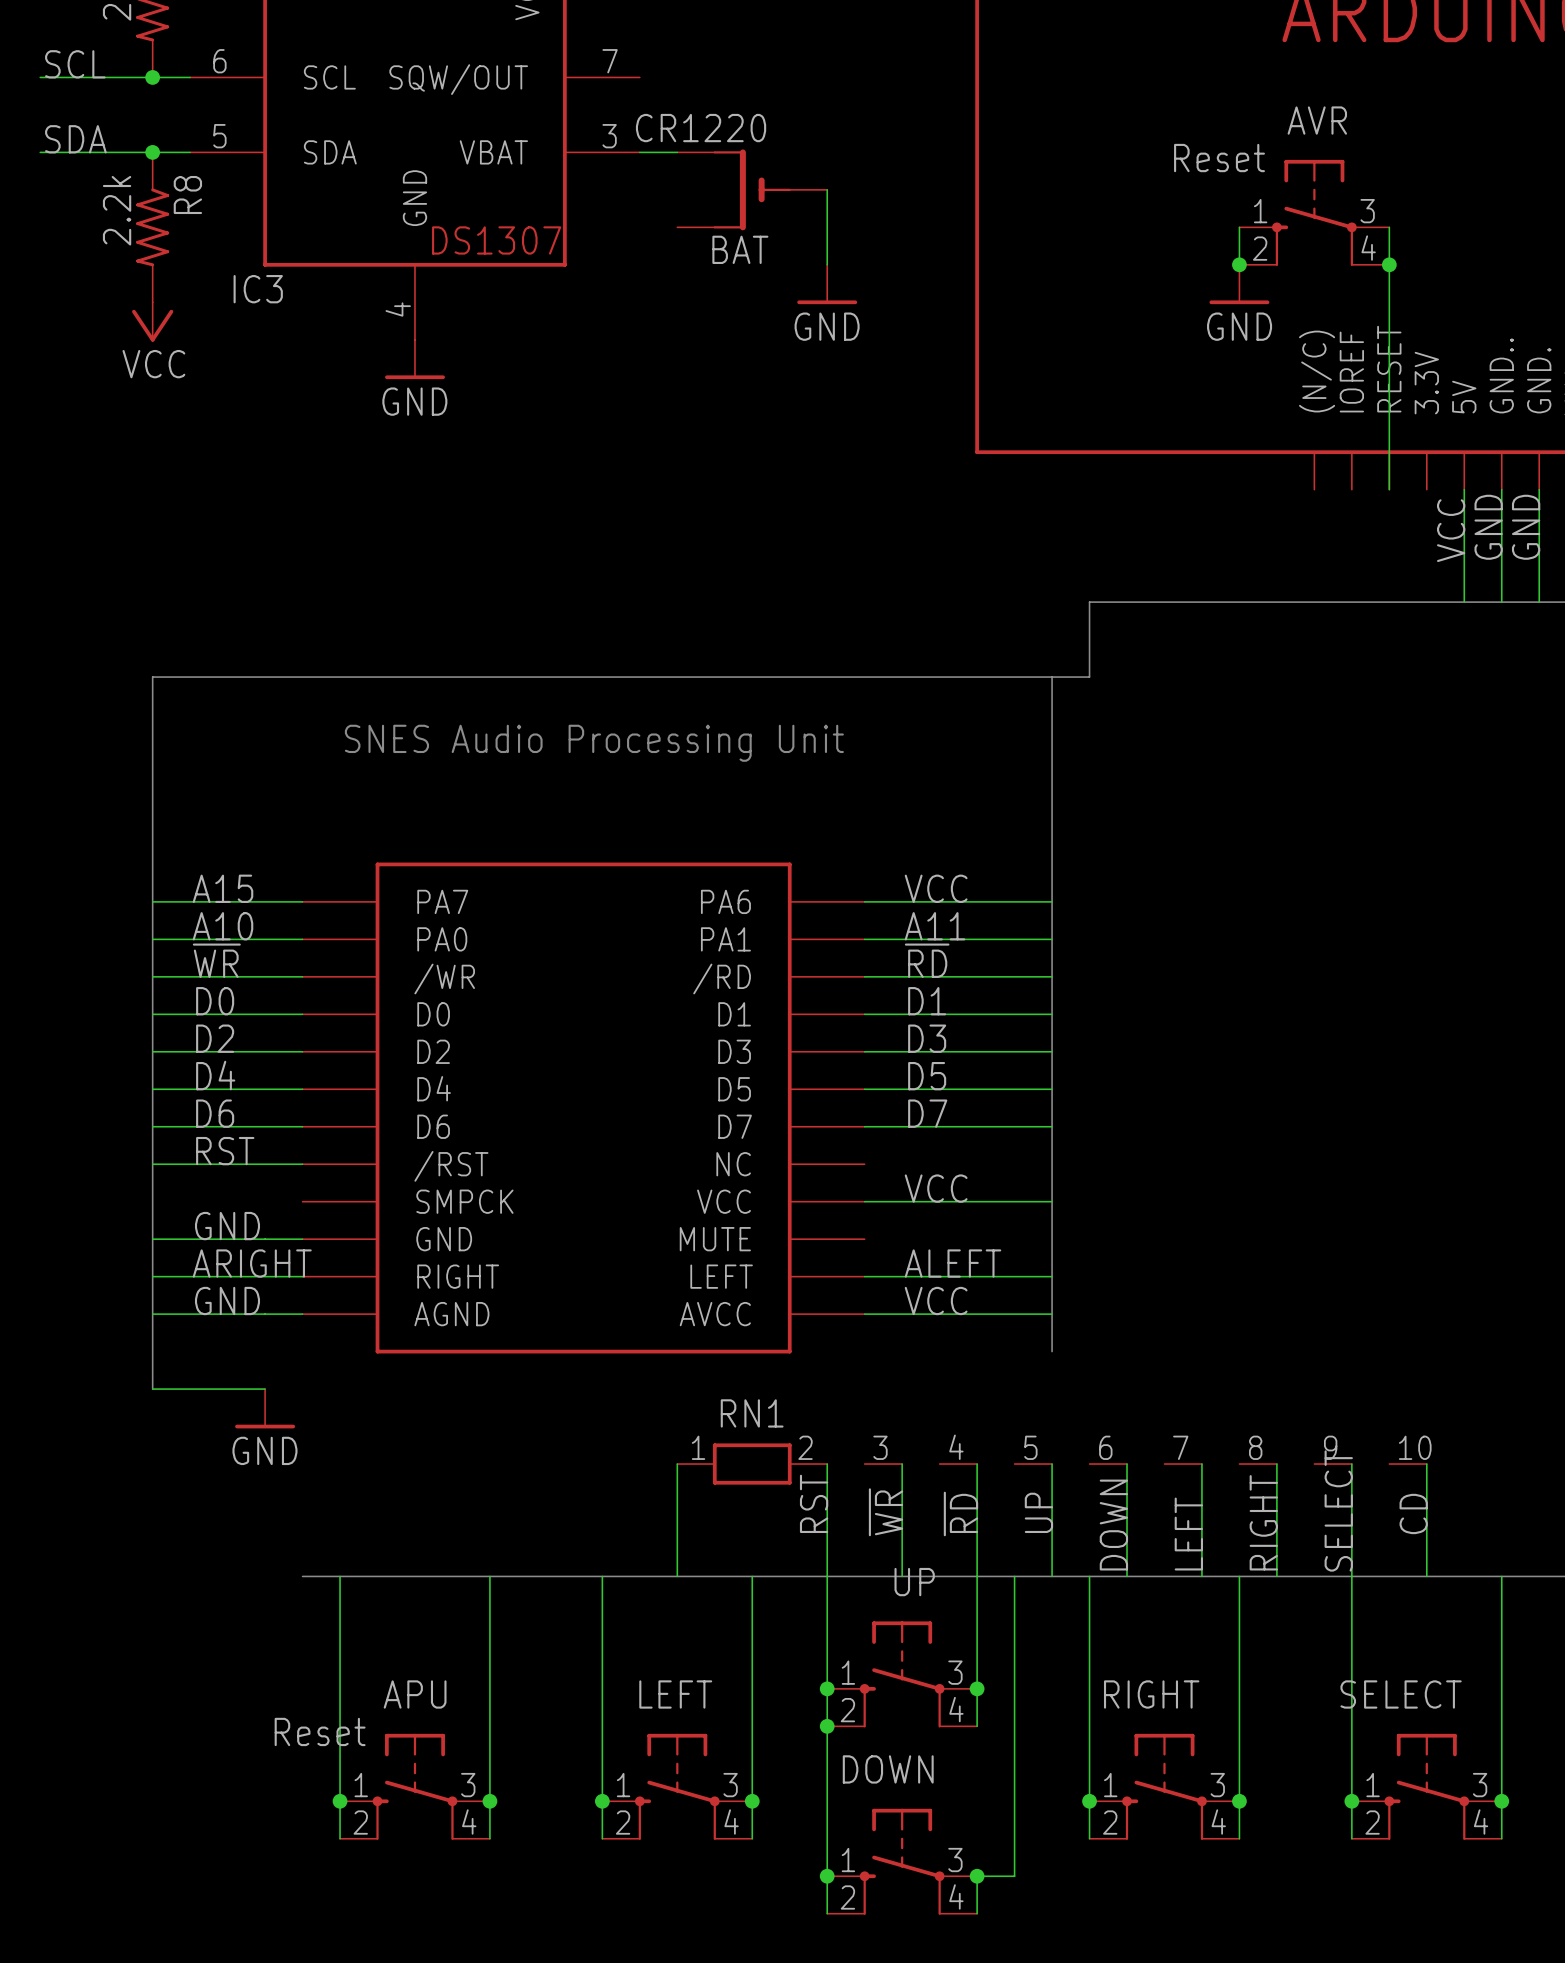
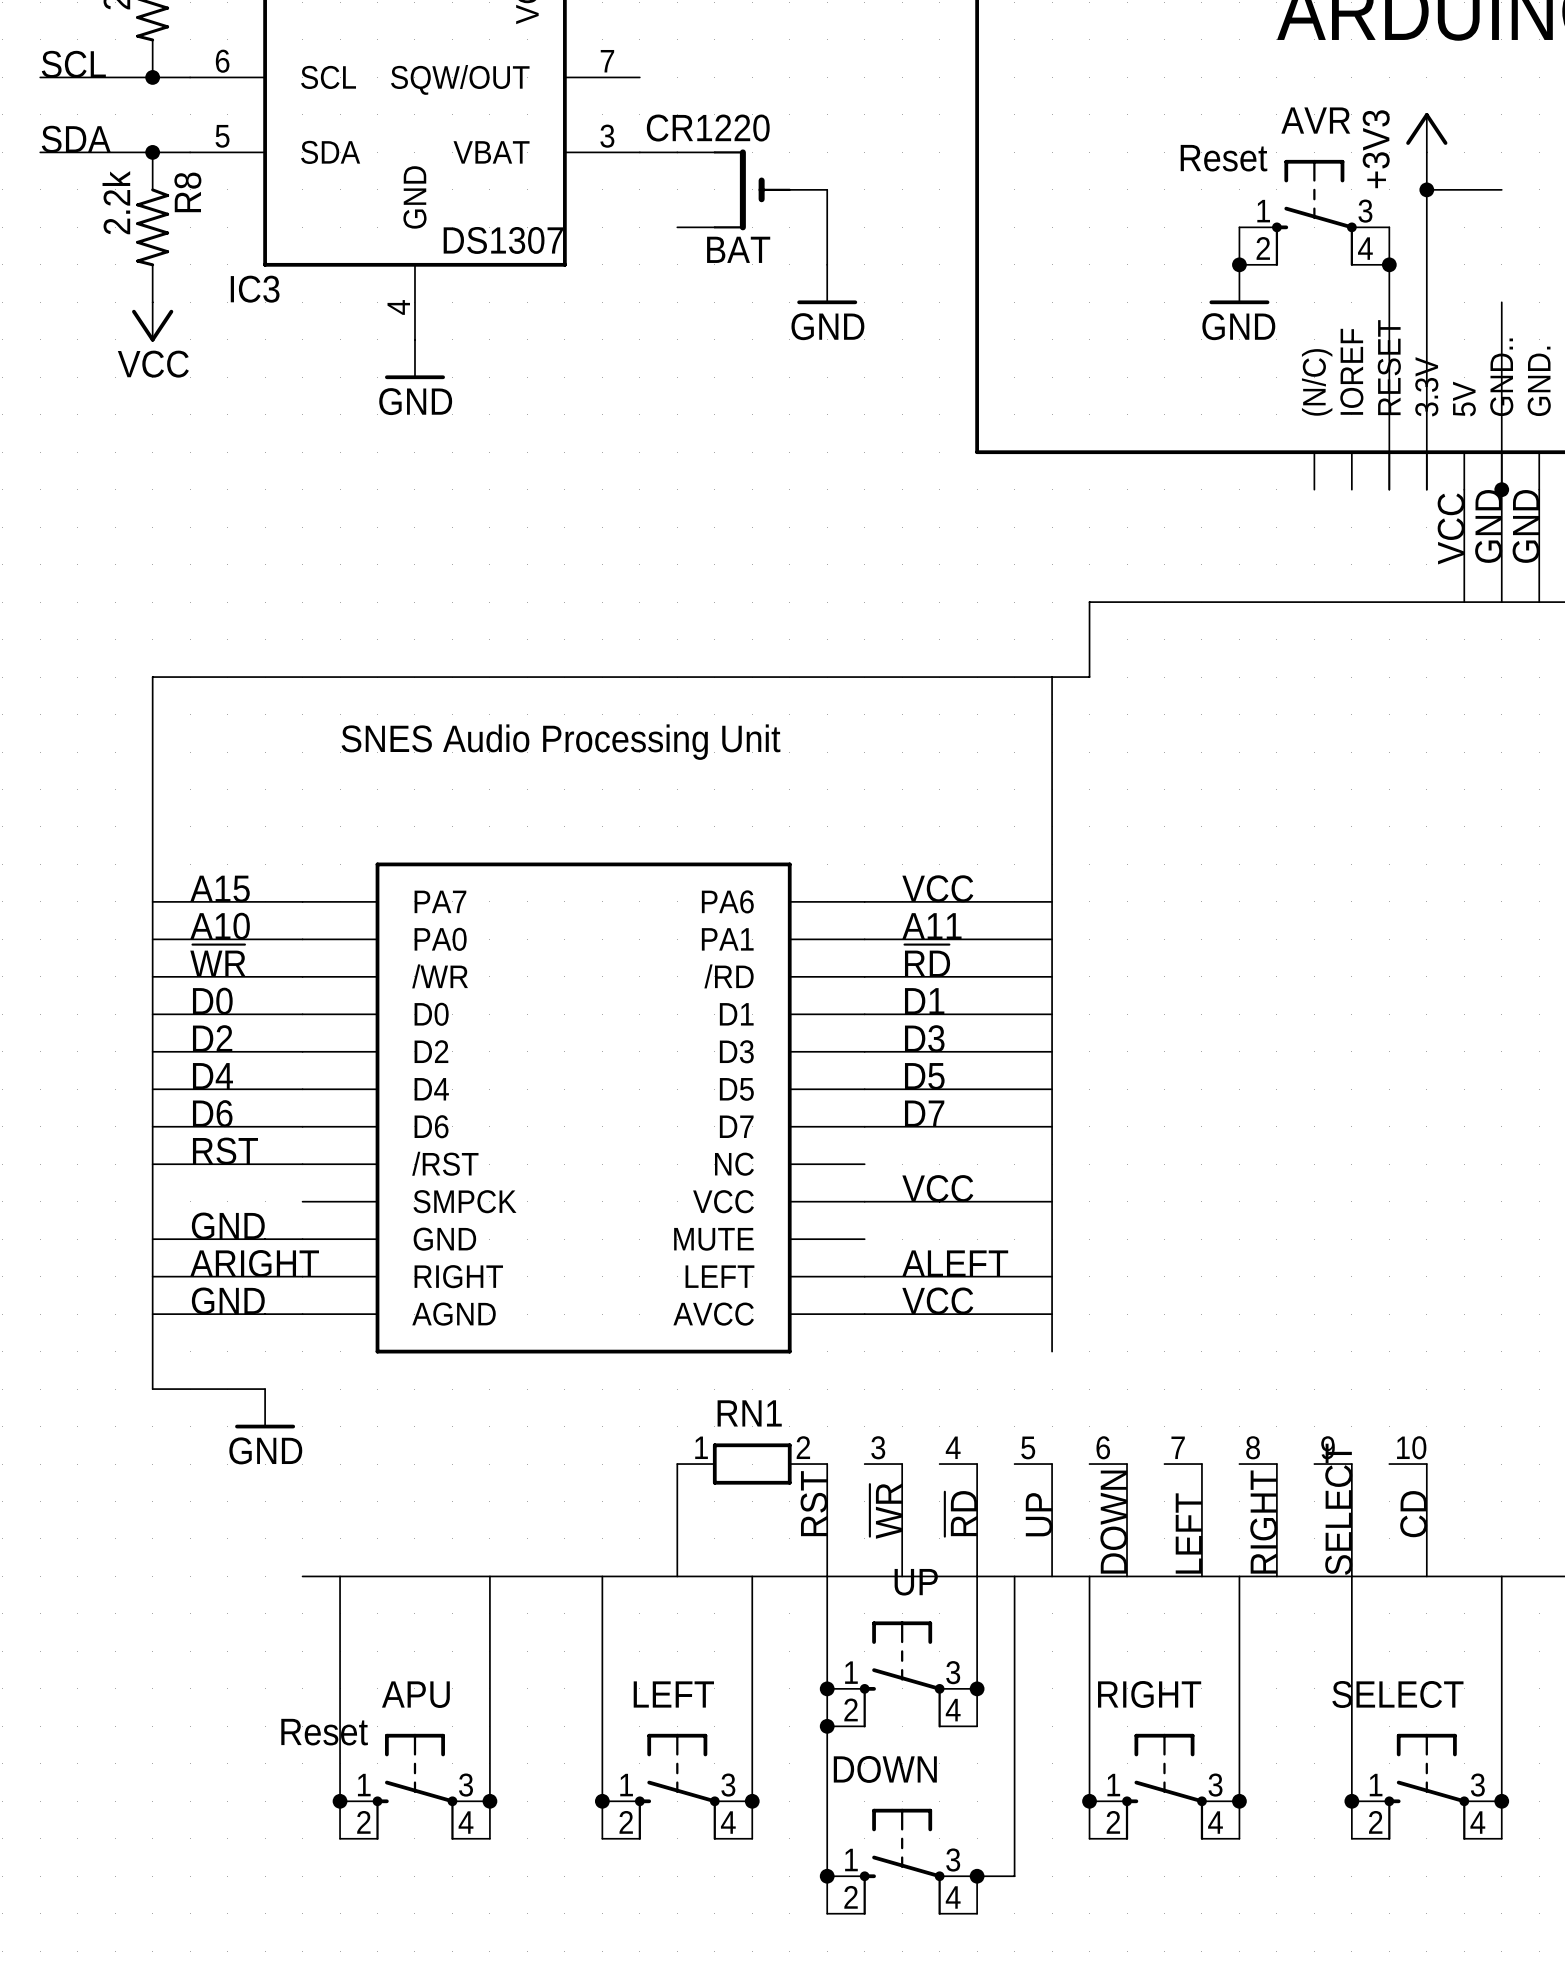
power symbol: none -> +3V3 (1426, 132)
wire: none -> (1426, 152) (1426, 489)
wire: none -> (1426, 189) (1501, 189)
junction: none -> (1426, 189)
wire: none -> (1501, 302) (1501, 489)
junction: none -> (1501, 489)

